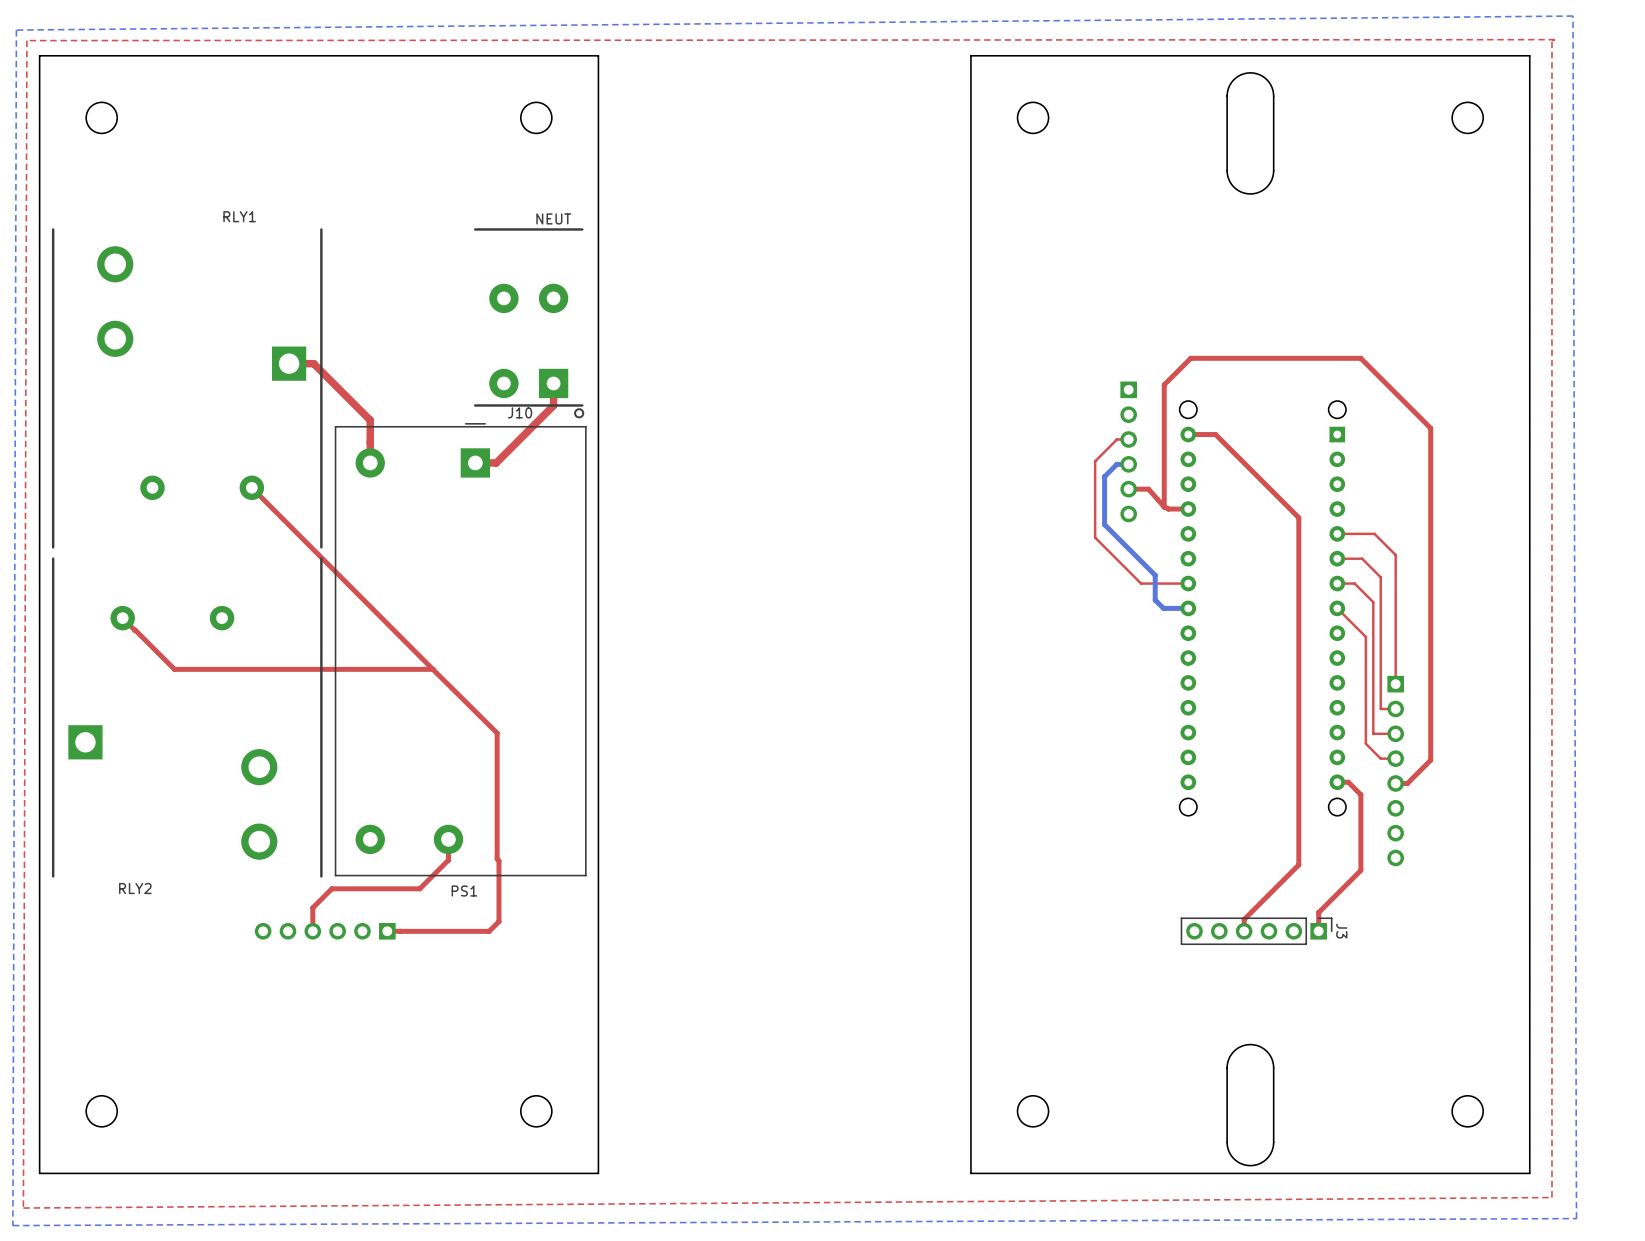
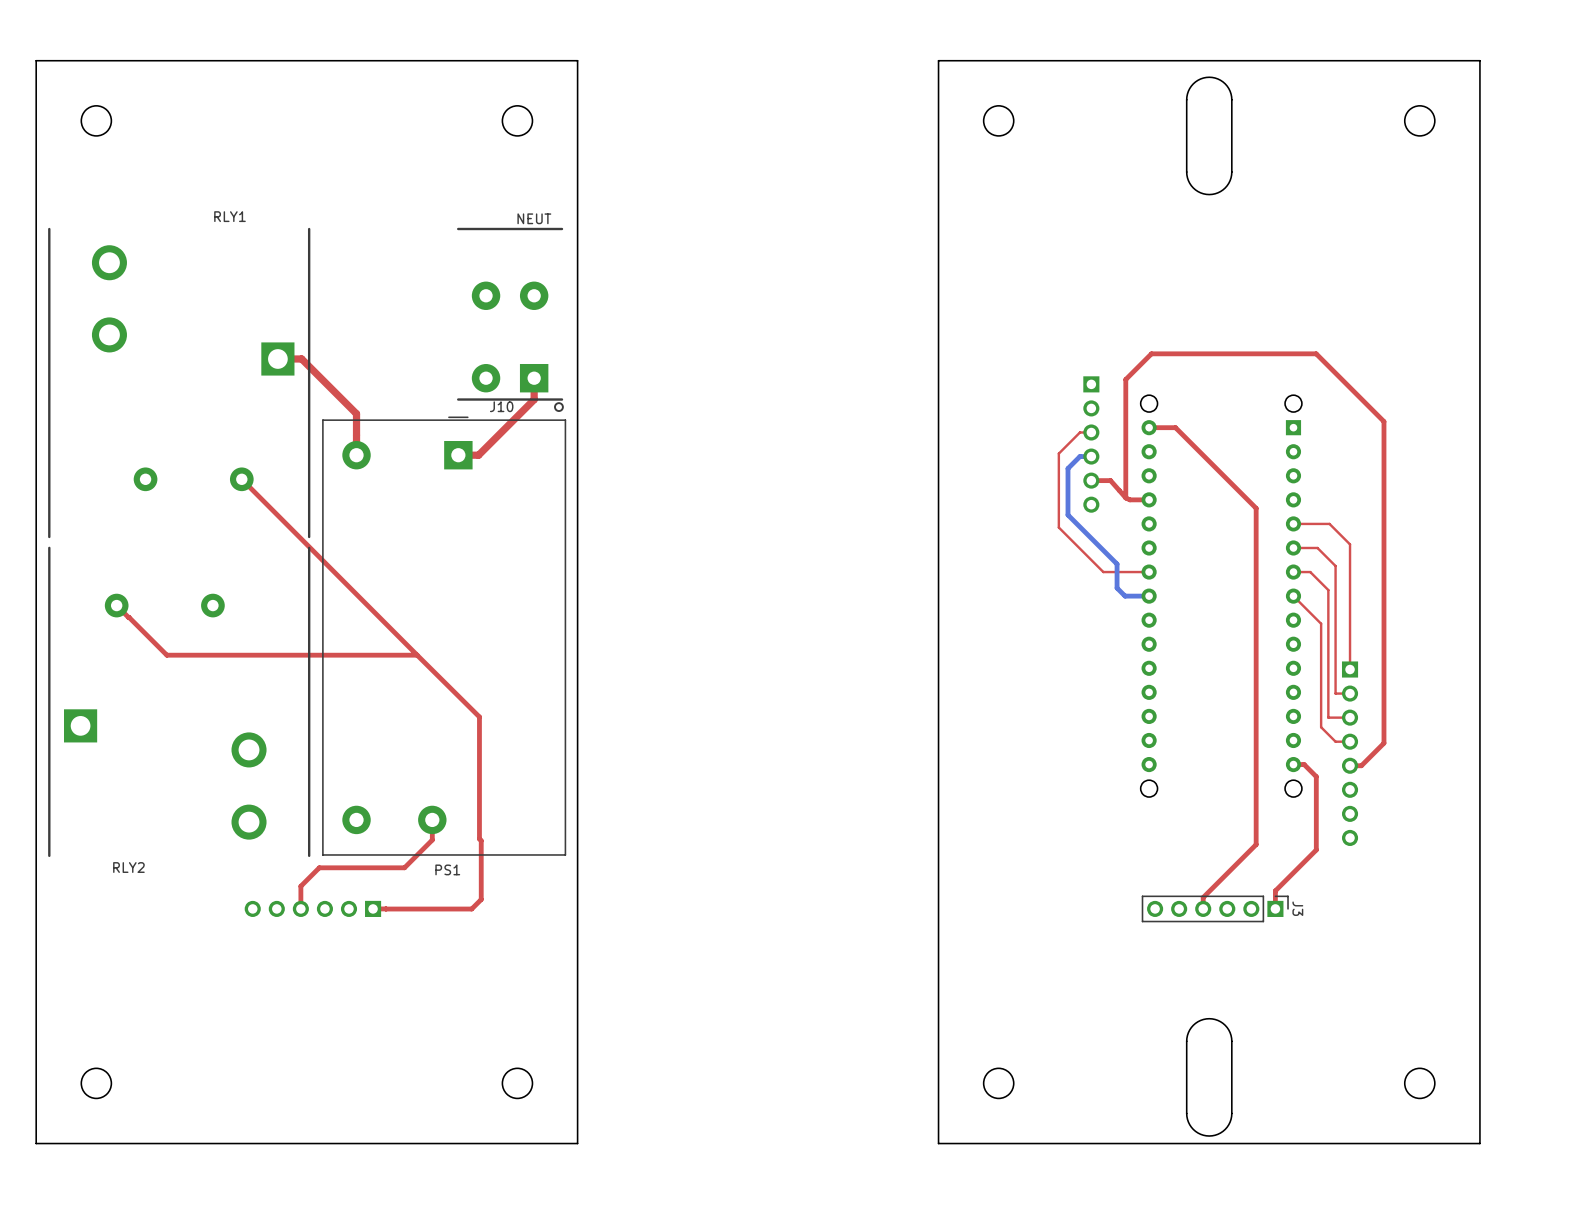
bottom zone outline: (1573, 16) (1576, 1218) (12, 1225) (16, 30) (1573, 16) -> none
top zone outline: (1555, 39) (1551, 40) (1551, 1197) (23, 1208) (26, 40) (1555, 39) -> none

